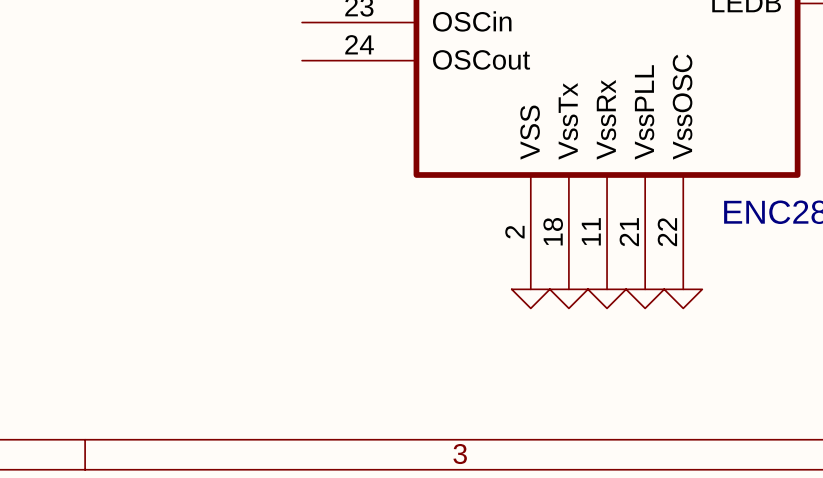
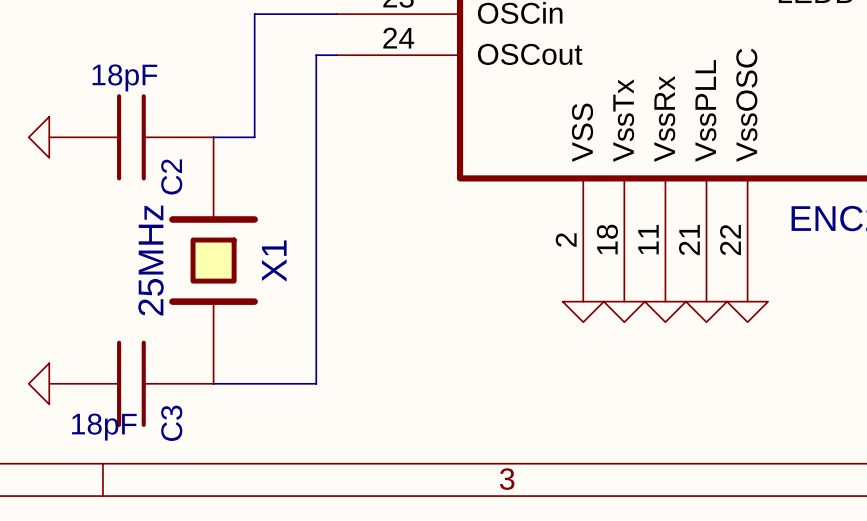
wire: none -> (336, 14) (254, 14) (254, 137) (213, 137)
wire: none -> (336, 55) (316, 55) (316, 383) (213, 383)
power symbol: none -> (39, 137)
C2: none -> 18pF (131, 137)
X1: none -> 25MHz (213, 260)
power symbol: none -> (39, 383)
C3: none -> 18pF (131, 383)

